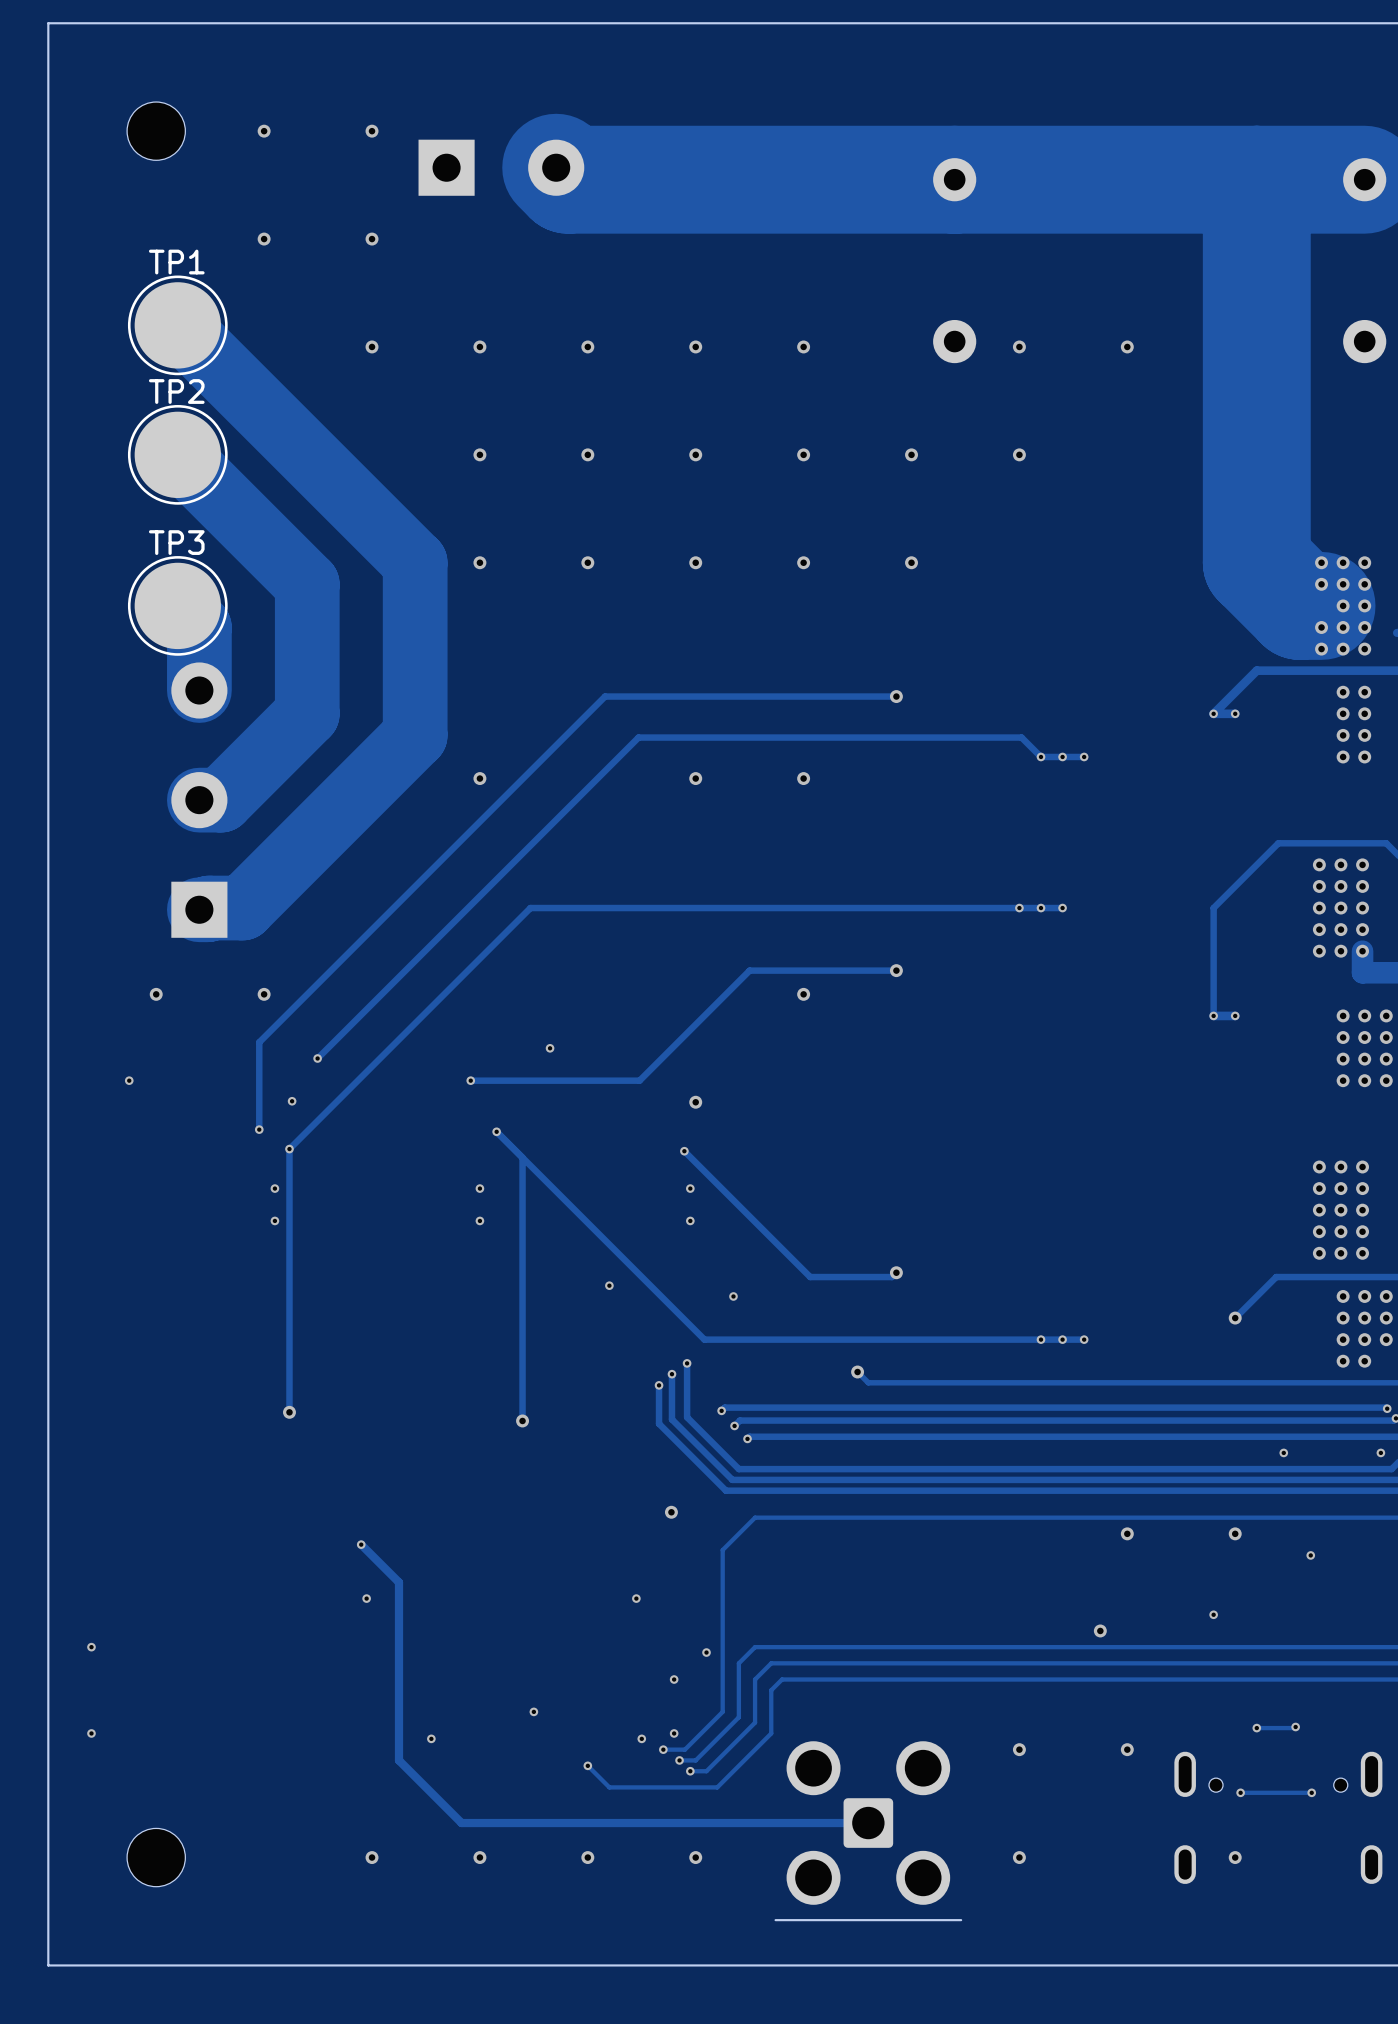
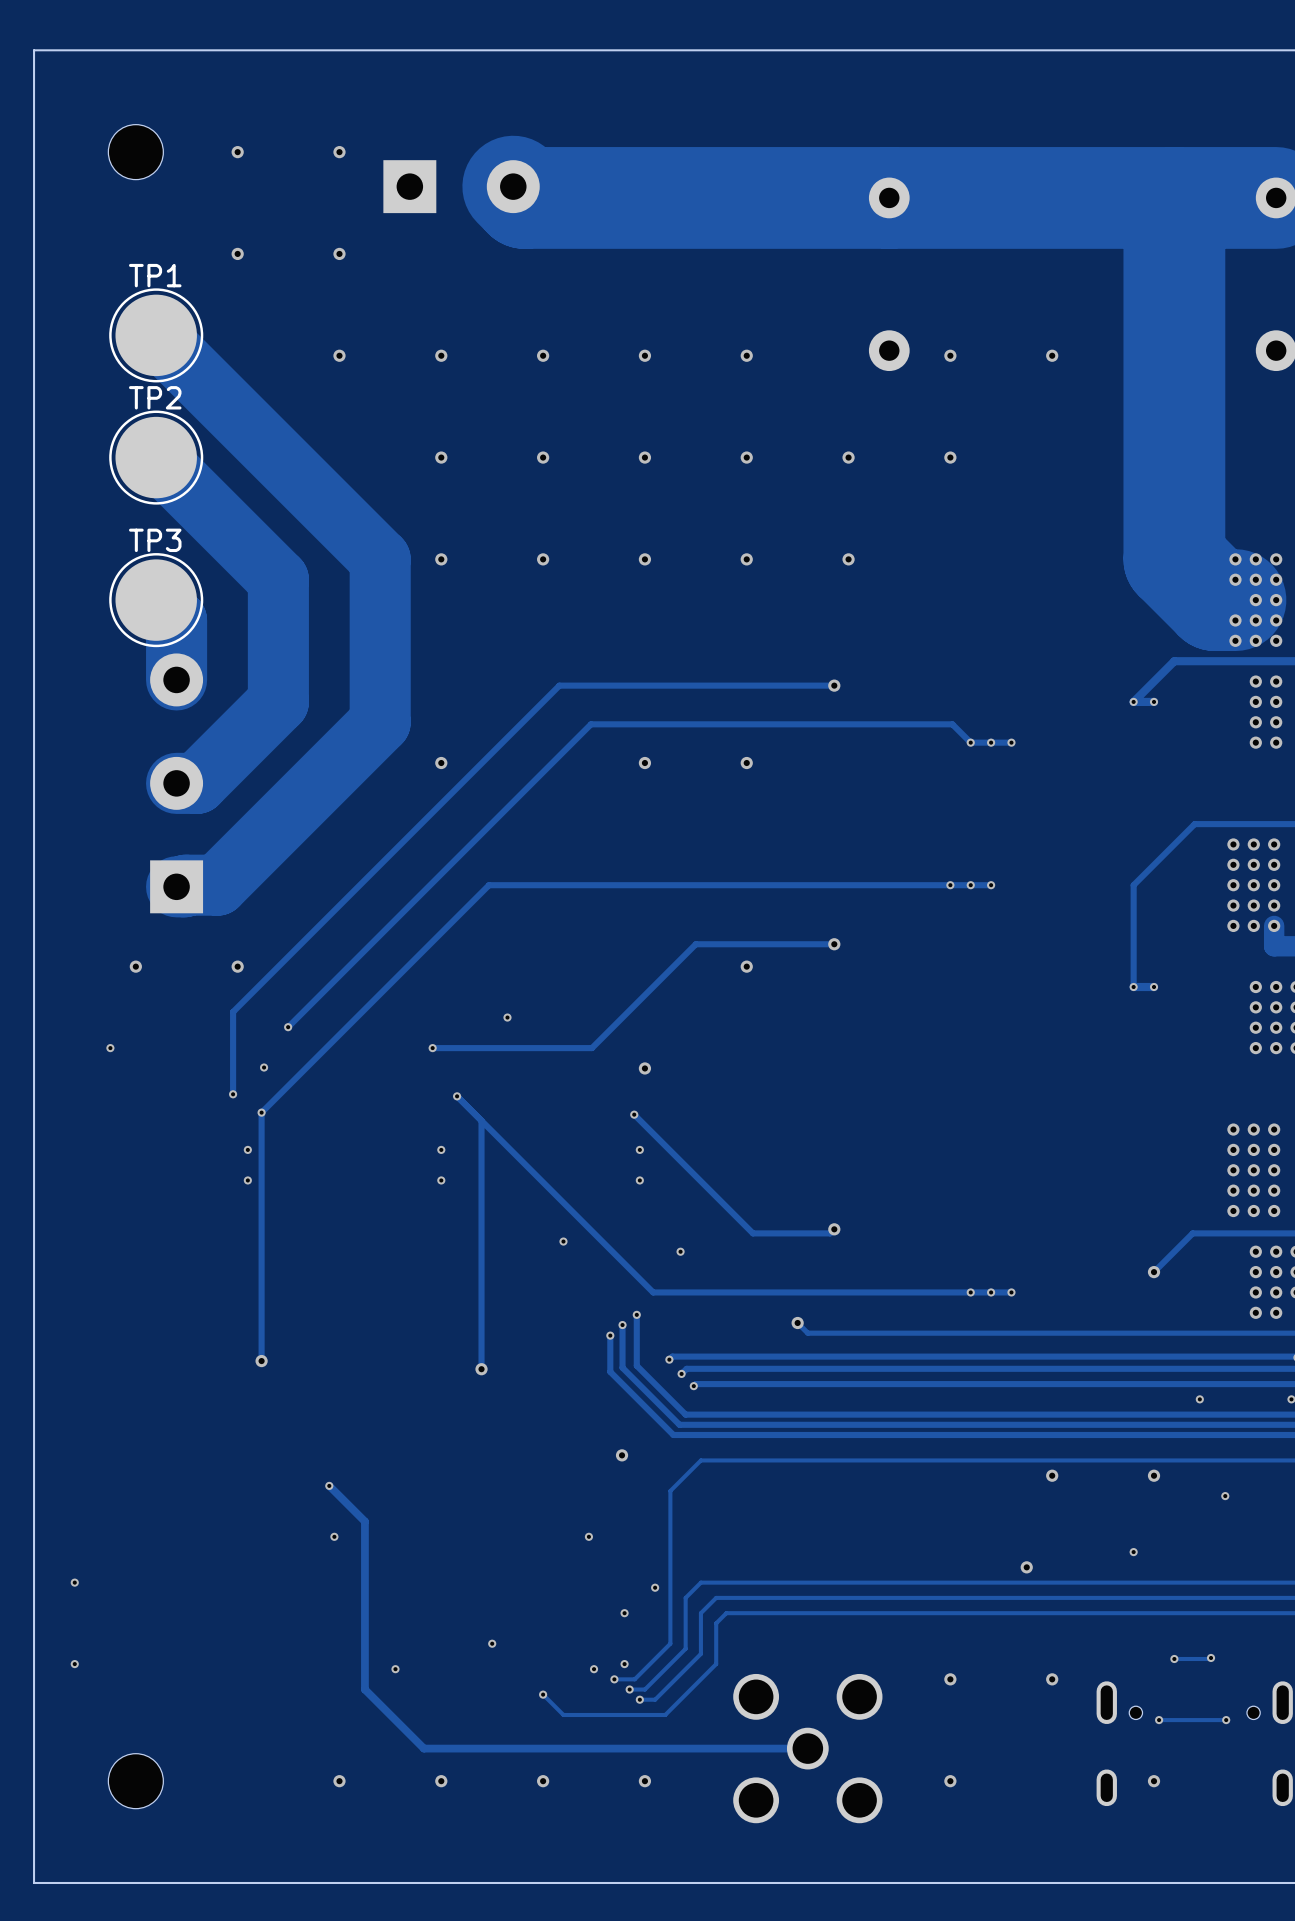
part footprint: [774, 1741, 963, 1922] -> [733, 1673, 883, 1824]

